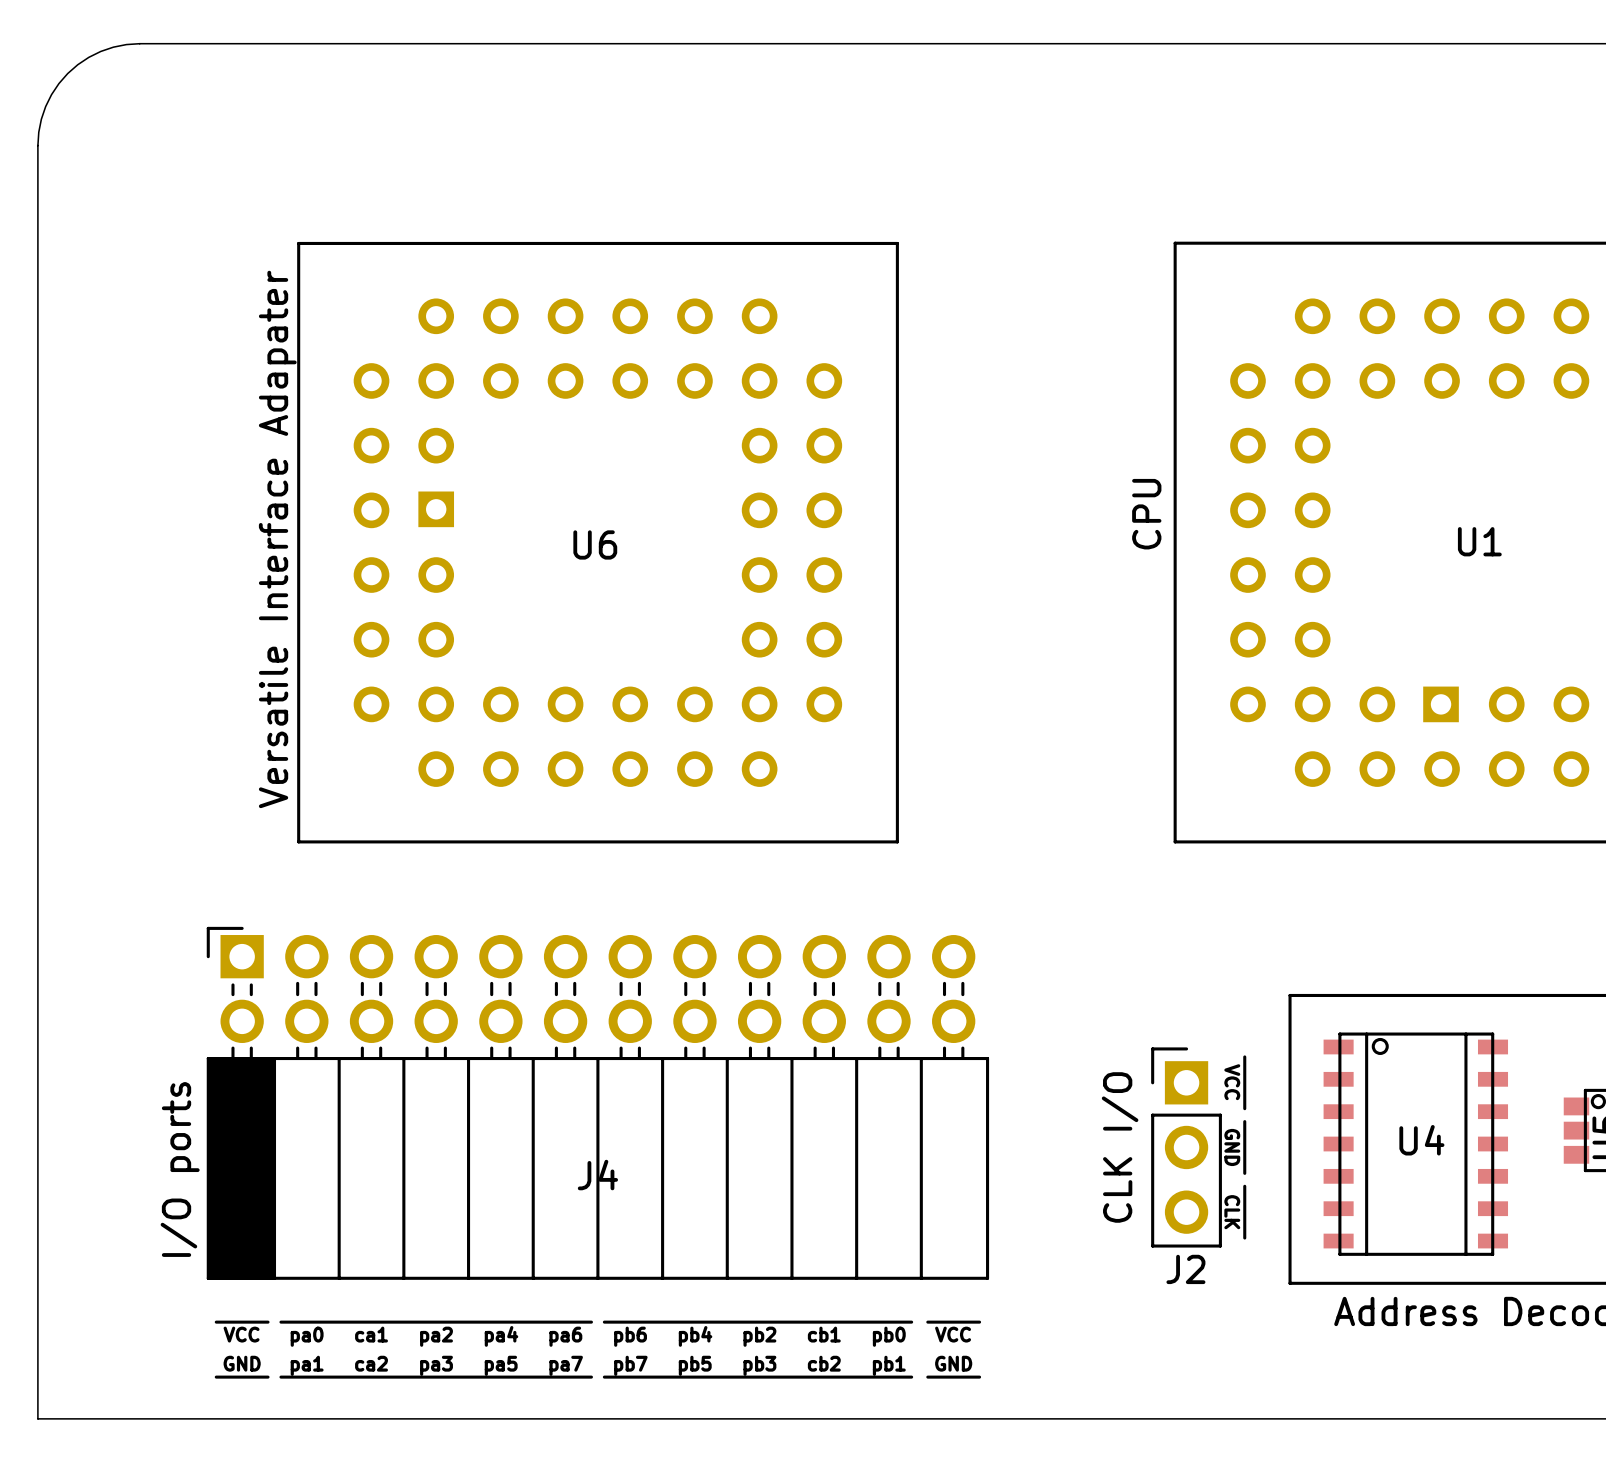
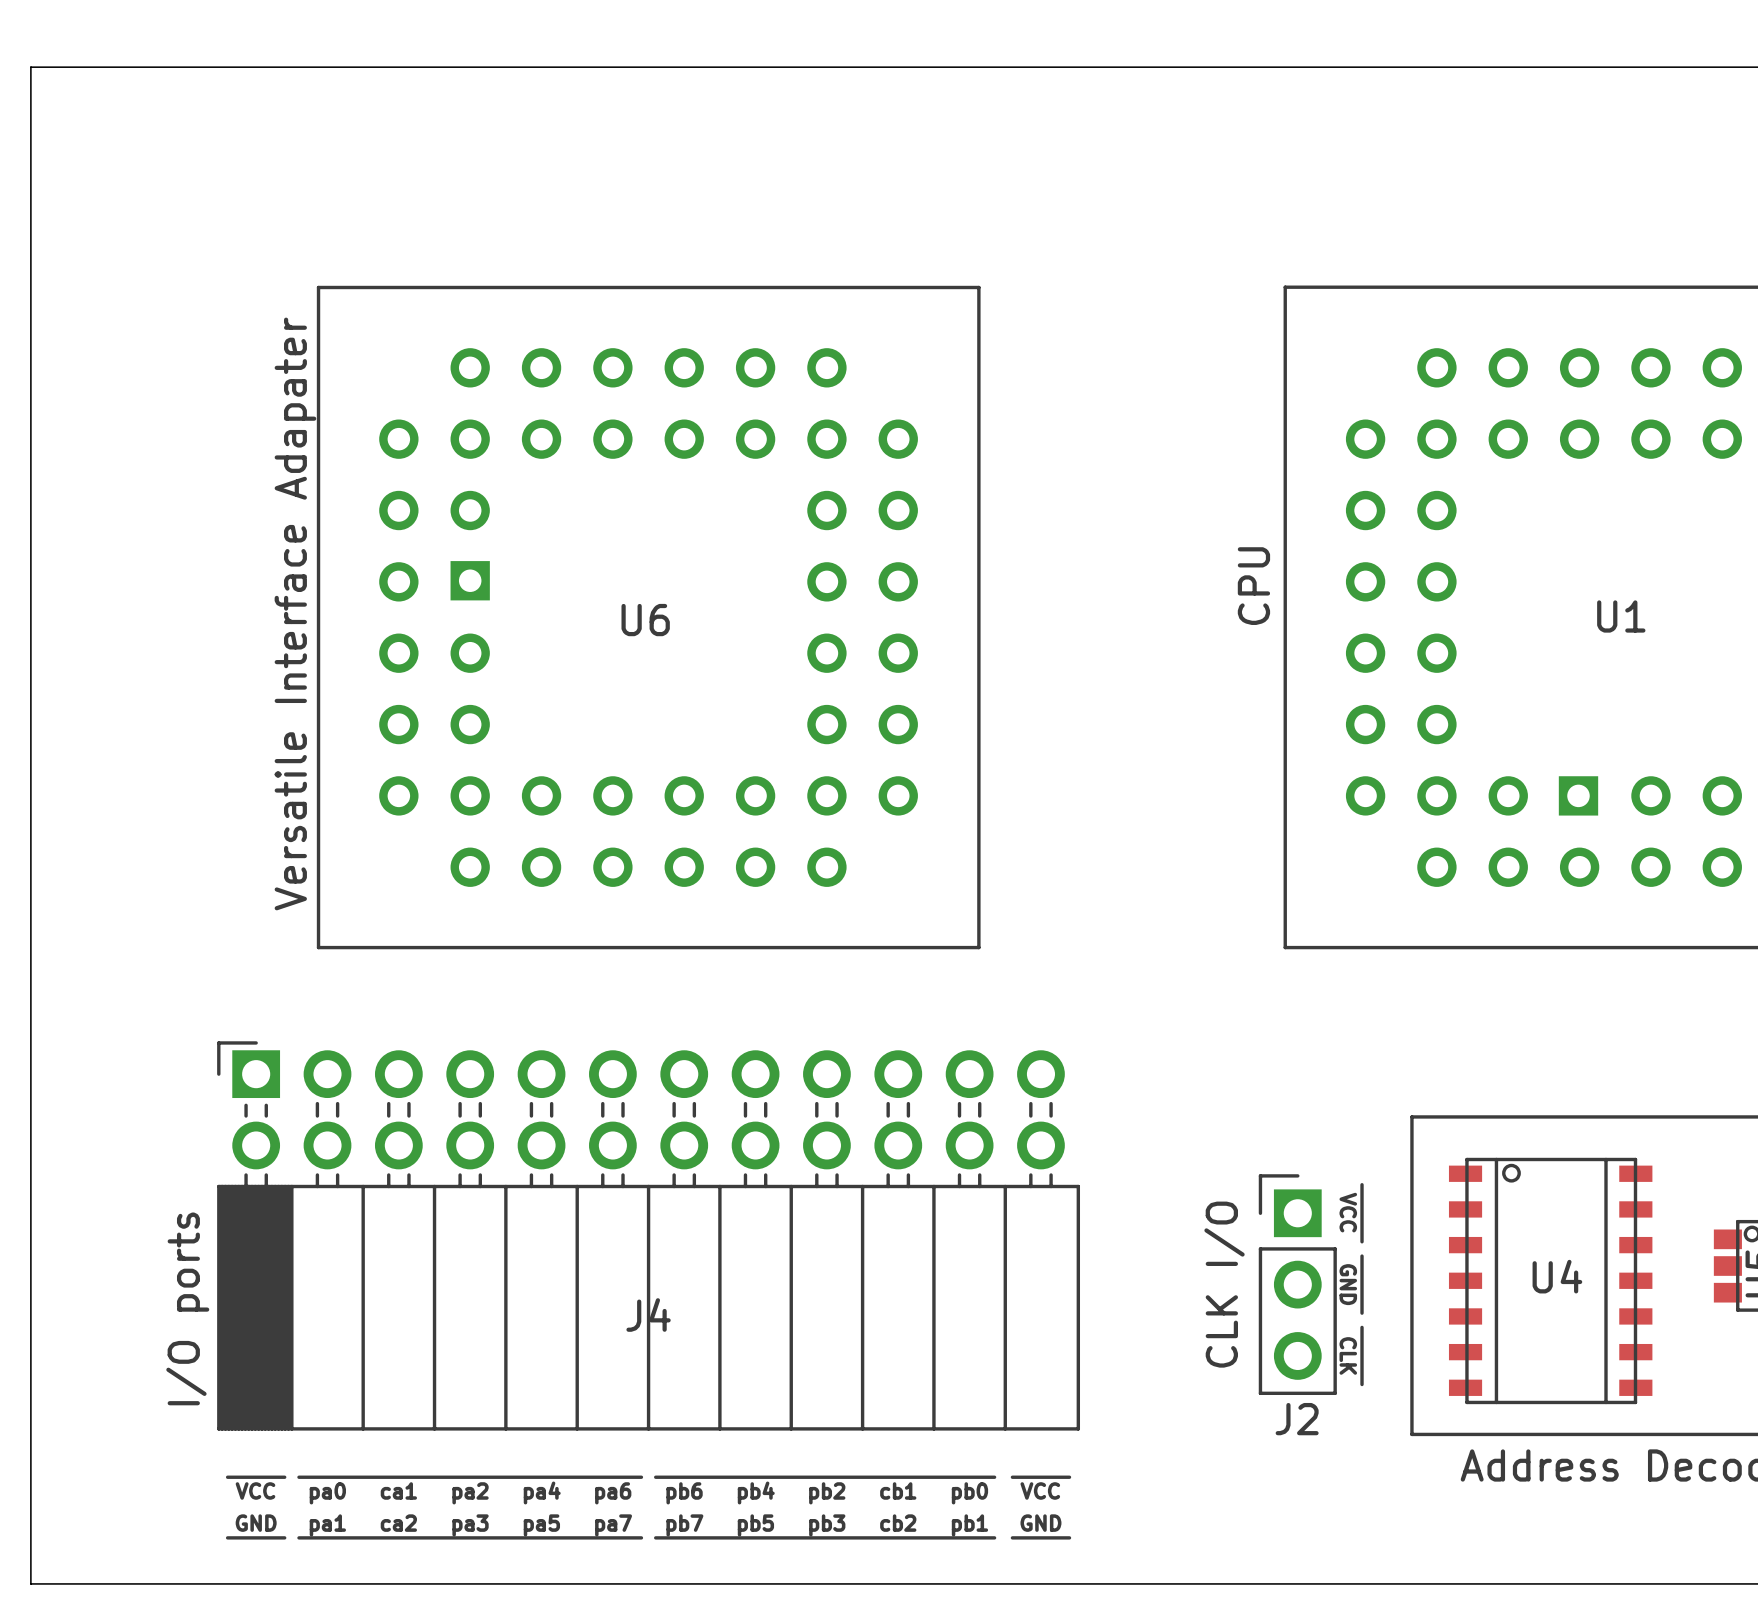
board edge: (139, 43) (126, 44) (100, 51) (88, 57) (67, 73) (58, 83) (45, 106) (41, 119) (37, 145) -> (143, 67) (30, 67) (30, 179)

